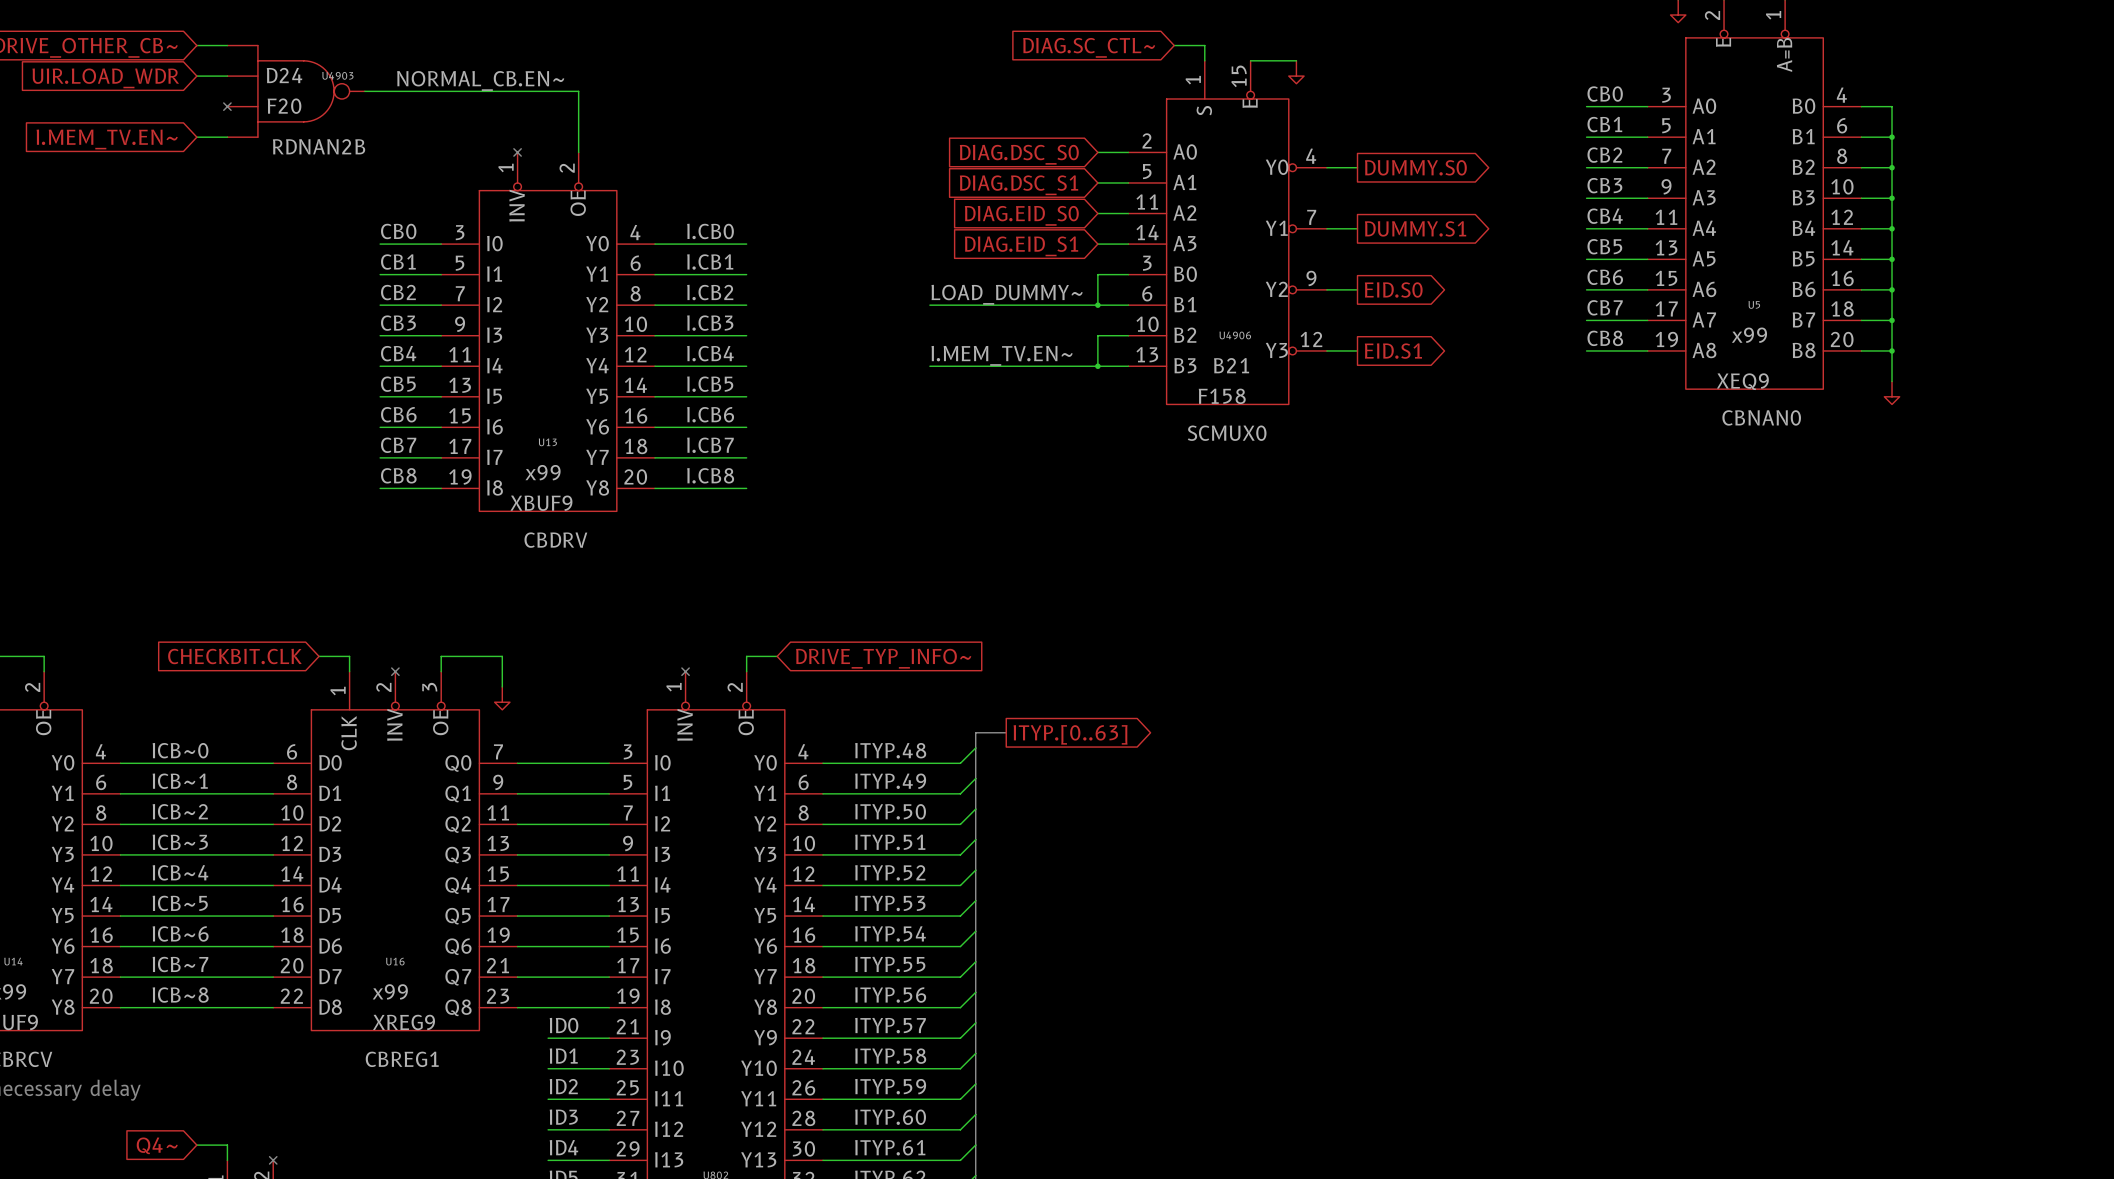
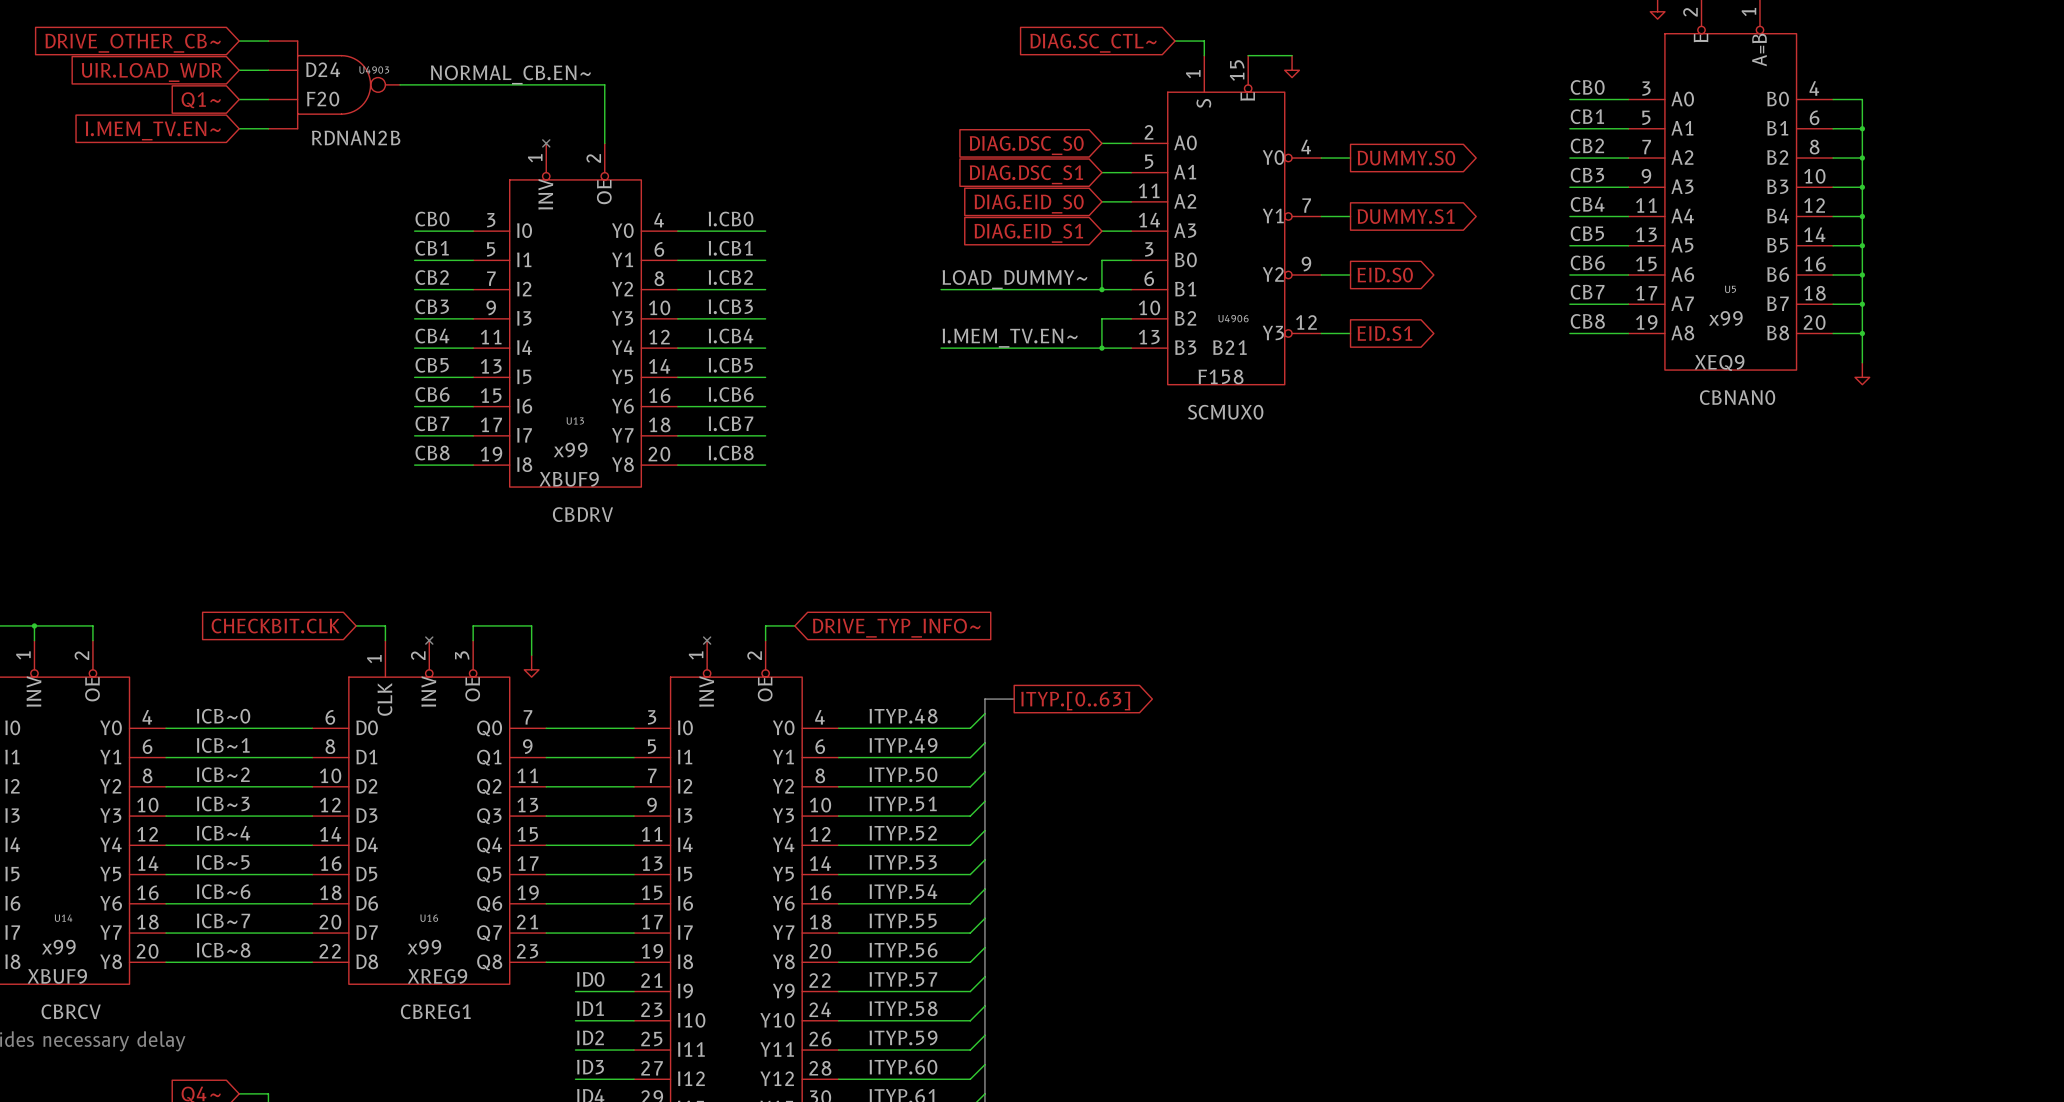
wire: none -> (239, 99) (268, 99)
no-connect mark: (227, 106) -> none
global label: none -> Q1~ (201, 100)

